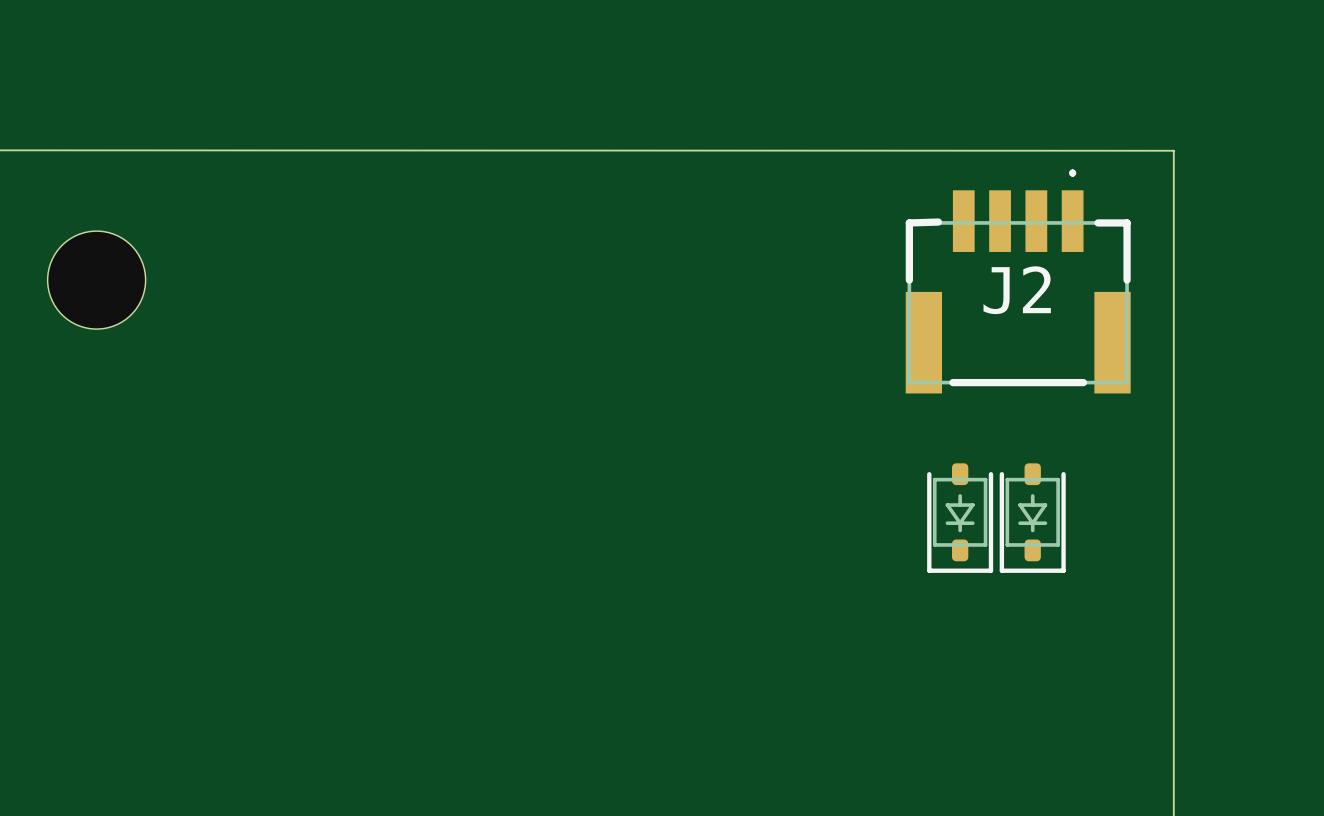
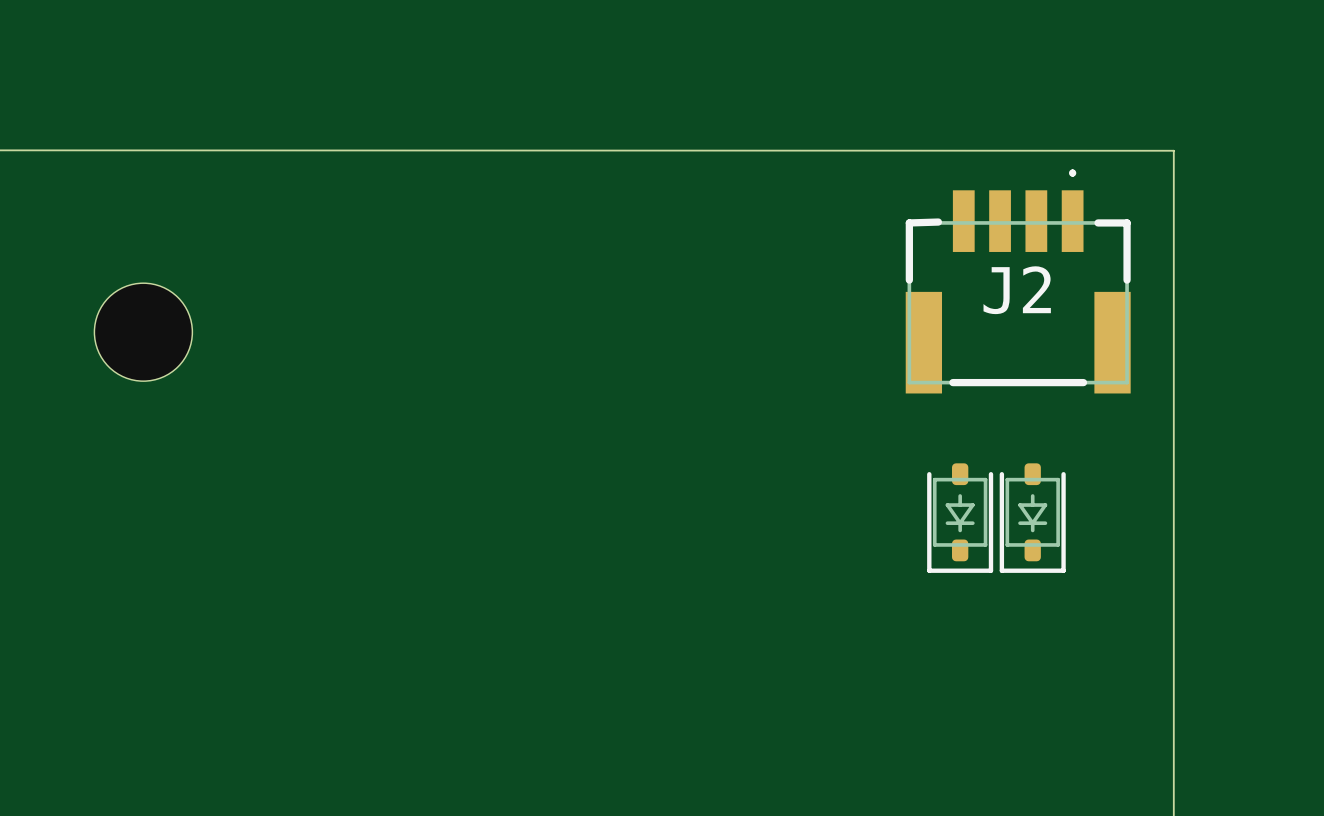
part position: (96, 280) -> (143, 332)

